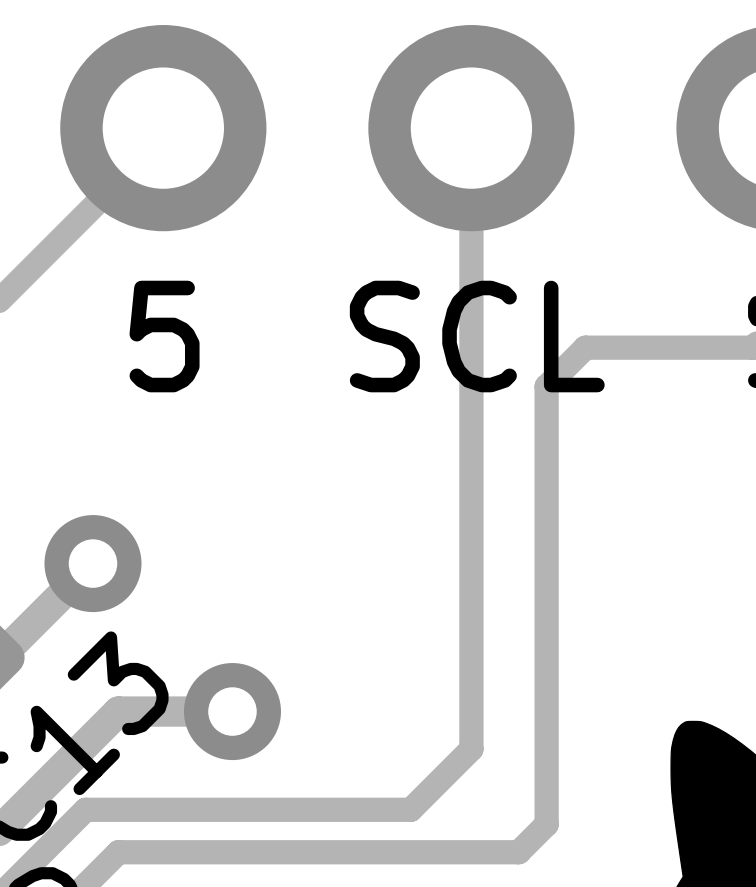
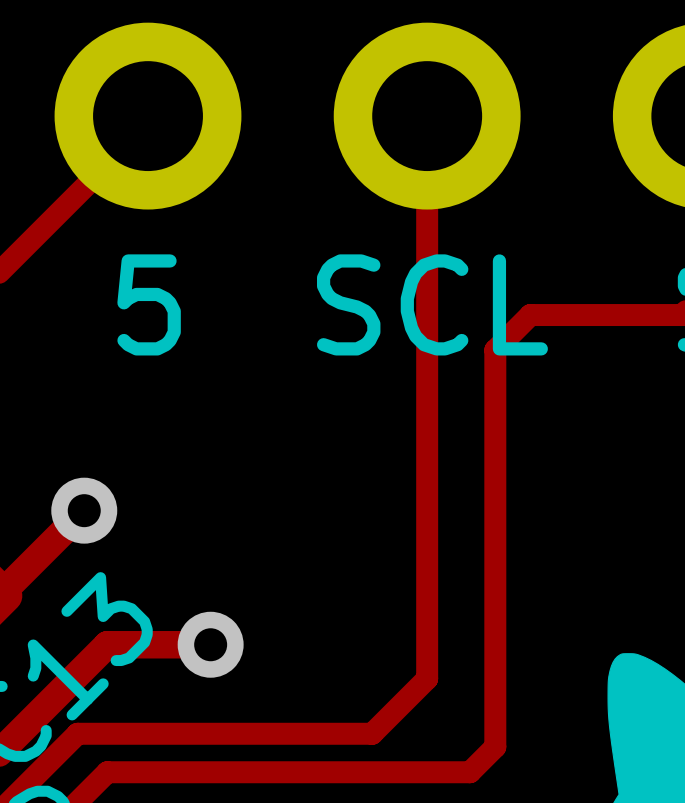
via size: [44, 515, 142, 613] -> [51, 477, 118, 544]
via size: [183, 663, 281, 761] -> [177, 611, 244, 678]

